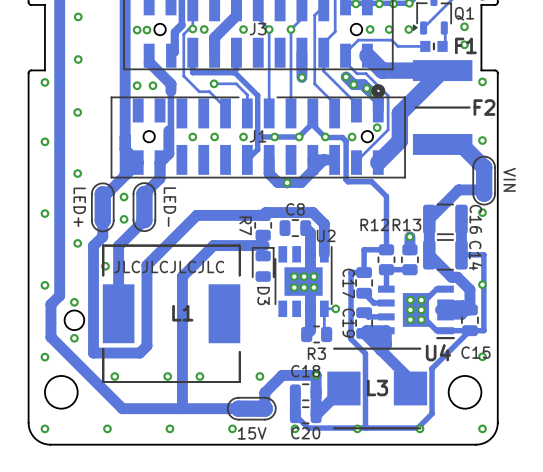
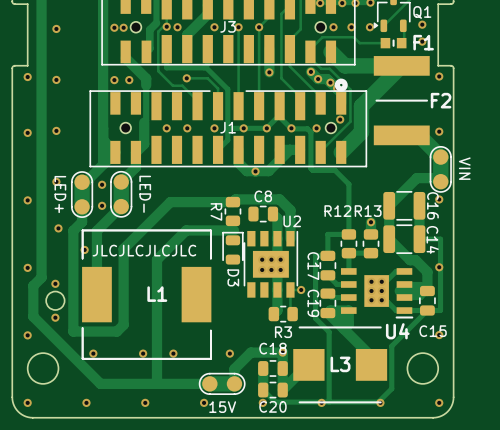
via: (78, 16) -> none
via: none -> (56, 28)
via: (78, 59) -> none
via: none -> (56, 79)
via: (77, 112) -> none
via: none -> (56, 130)
via: (77, 173) -> none
via: none -> (56, 181)

